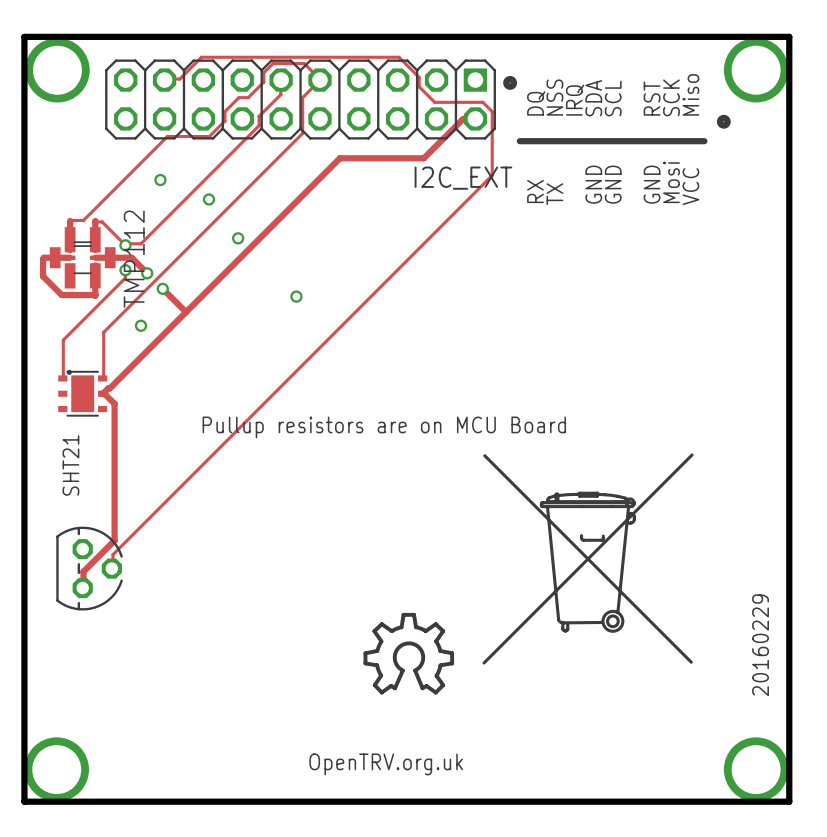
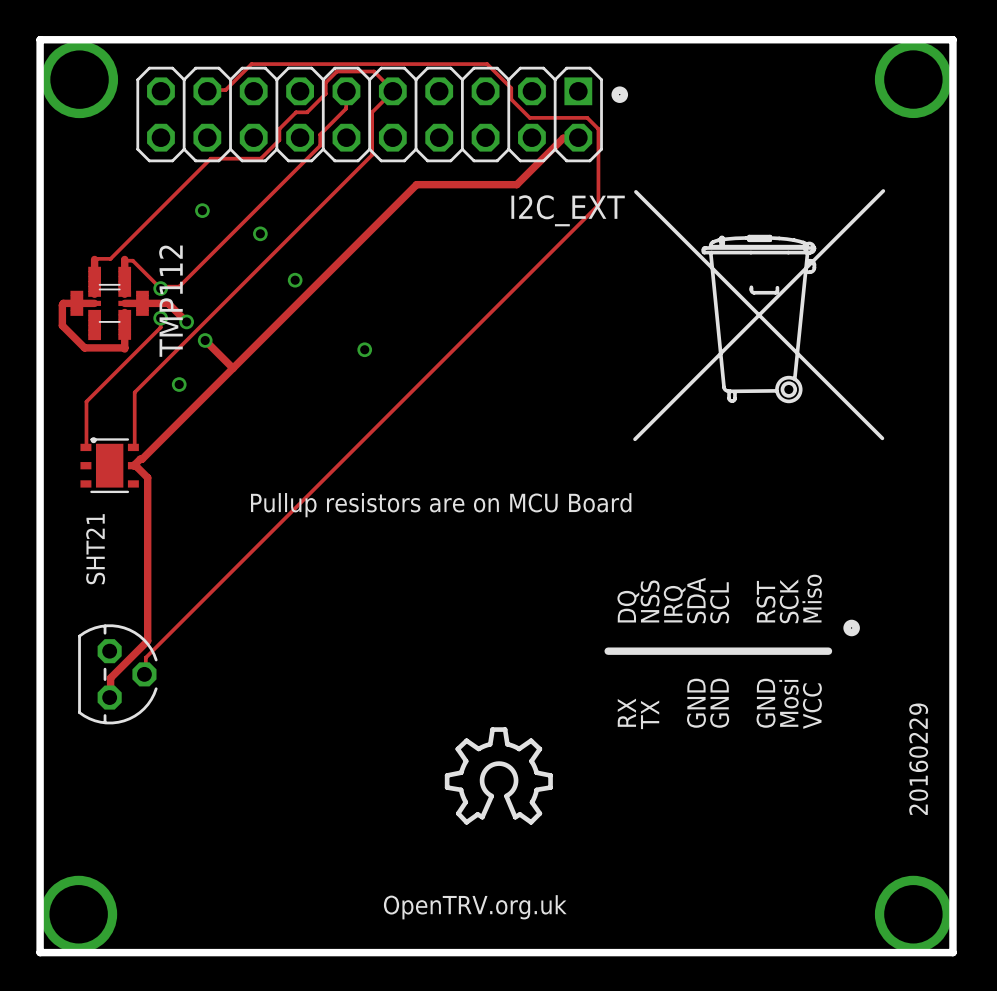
text: Miso (690, 94) -> none
text: NSS (554, 97) -> none
text: SCK (671, 97) -> none
text: SDA (593, 98) -> none
text: SCL (613, 98) -> none
text: RST (652, 98) -> none
text: IRQ (575, 100) -> none
text: DQ (536, 103) -> none
drawing: [716, 114, 731, 129] -> none
line: (519, 141) (704, 141) -> none
text: Mosi (671, 182) -> none
text: GND (593, 184) -> none
text: GND (613, 184) -> none
text: GND (652, 184) -> none
text: VCC (690, 186) -> none
text: RX (535, 191) -> none
text: TX (554, 194) -> none
text: none -> Miso (812, 598)
text: none -> NSS (650, 601)
text: none -> SCK (789, 601)
text: none -> SDA (696, 600)
text: none -> SCL (719, 602)
text: none -> RST (766, 601)
text: none -> IRQ (674, 604)
text: none -> DQ (628, 606)
drawing: none -> [843, 619, 860, 637]
line: none -> (608, 651) (828, 651)
drawing position: (588, 558) -> (759, 315)
text: none -> Mosi (788, 703)
text: none -> GND (696, 703)
text: none -> GND (719, 703)
text: none -> GND (766, 703)
text: none -> VCC (812, 706)
text: none -> RX (626, 712)
text: none -> TX (650, 714)

